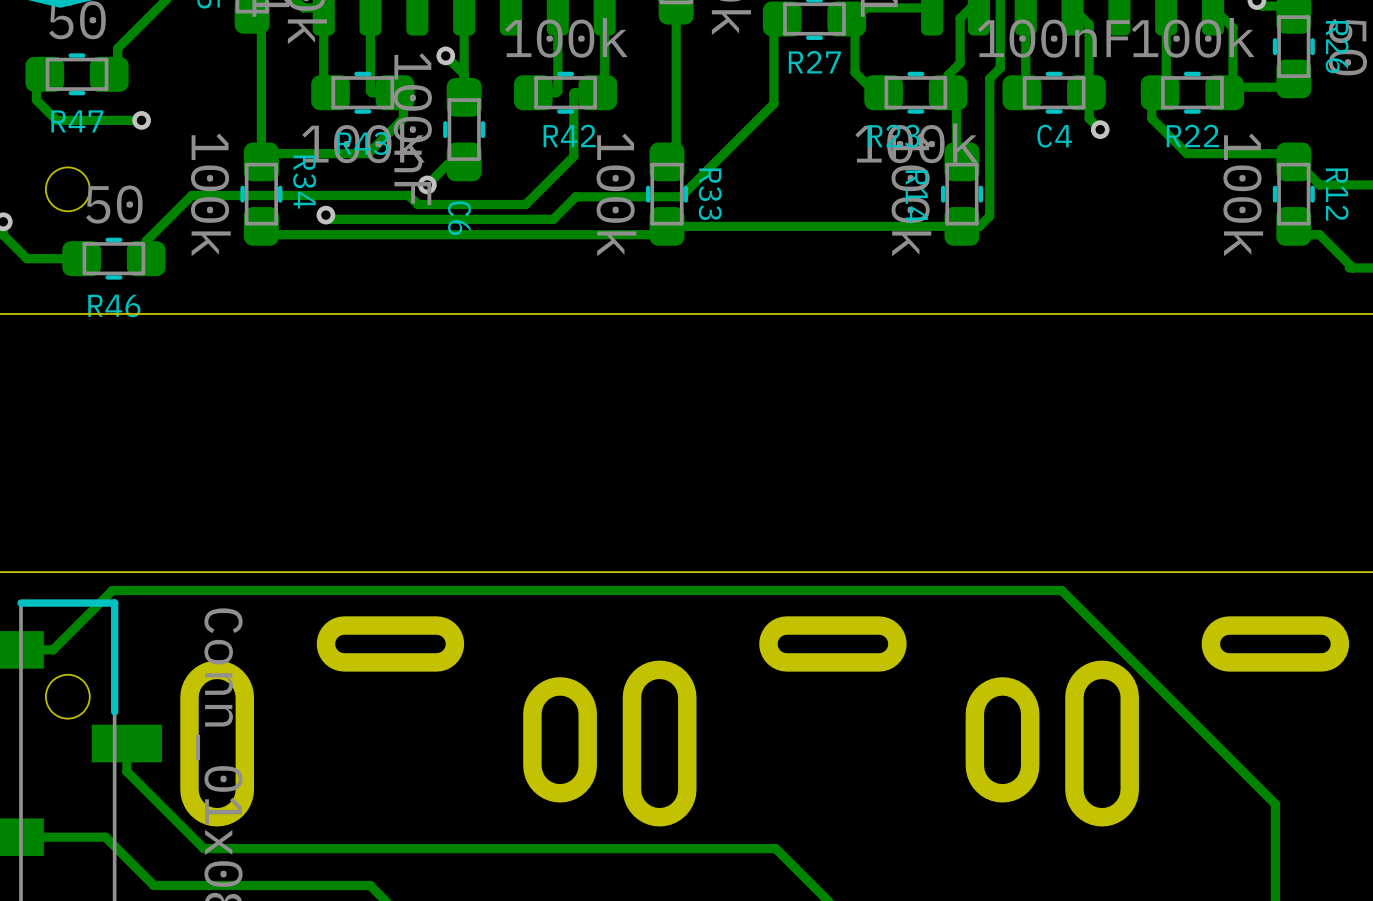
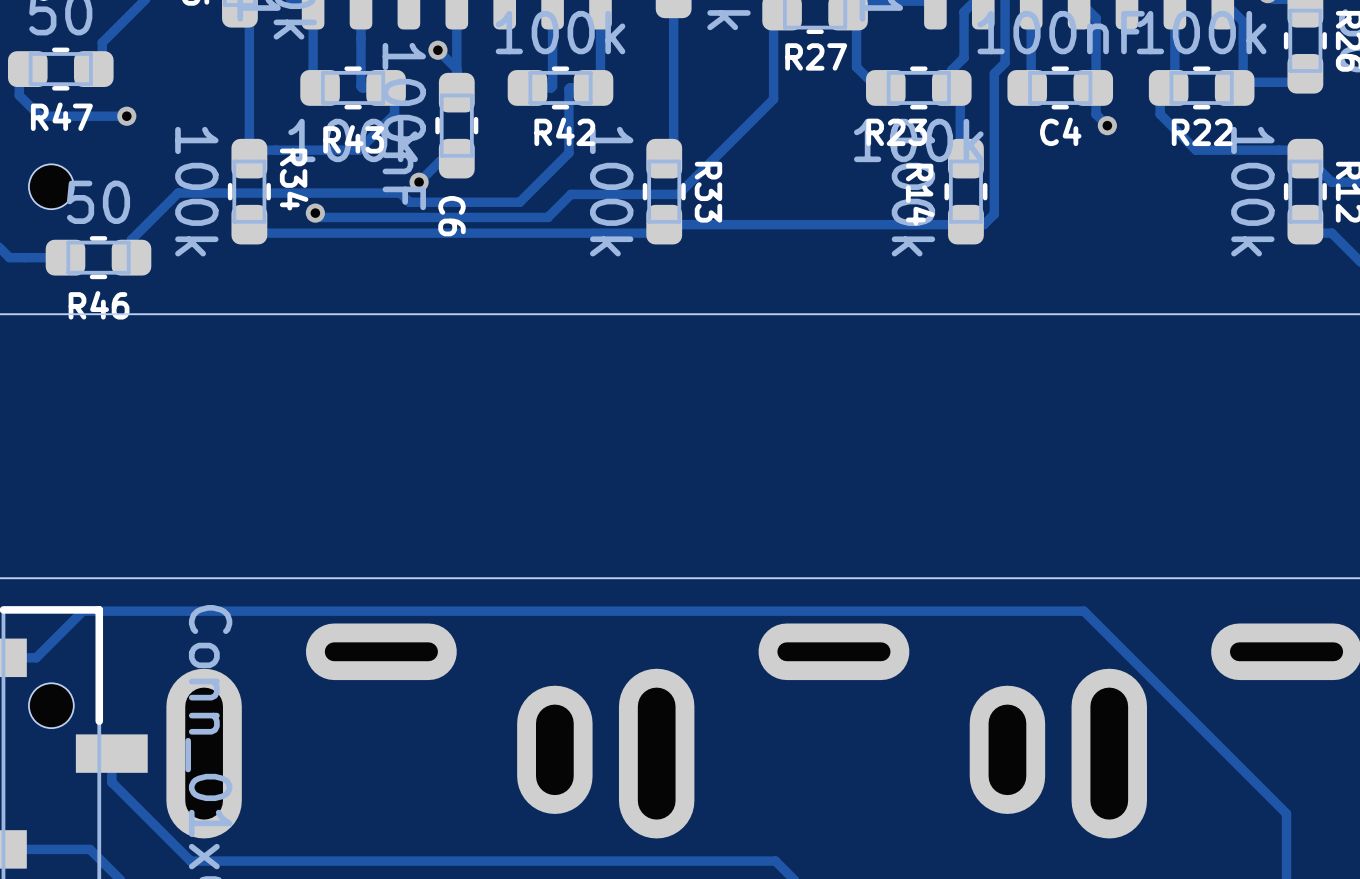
track: (98, 604) (112, 590) (1061, 590) (1275, 804) -> (82, 611) (1083, 611) (1286, 815)

